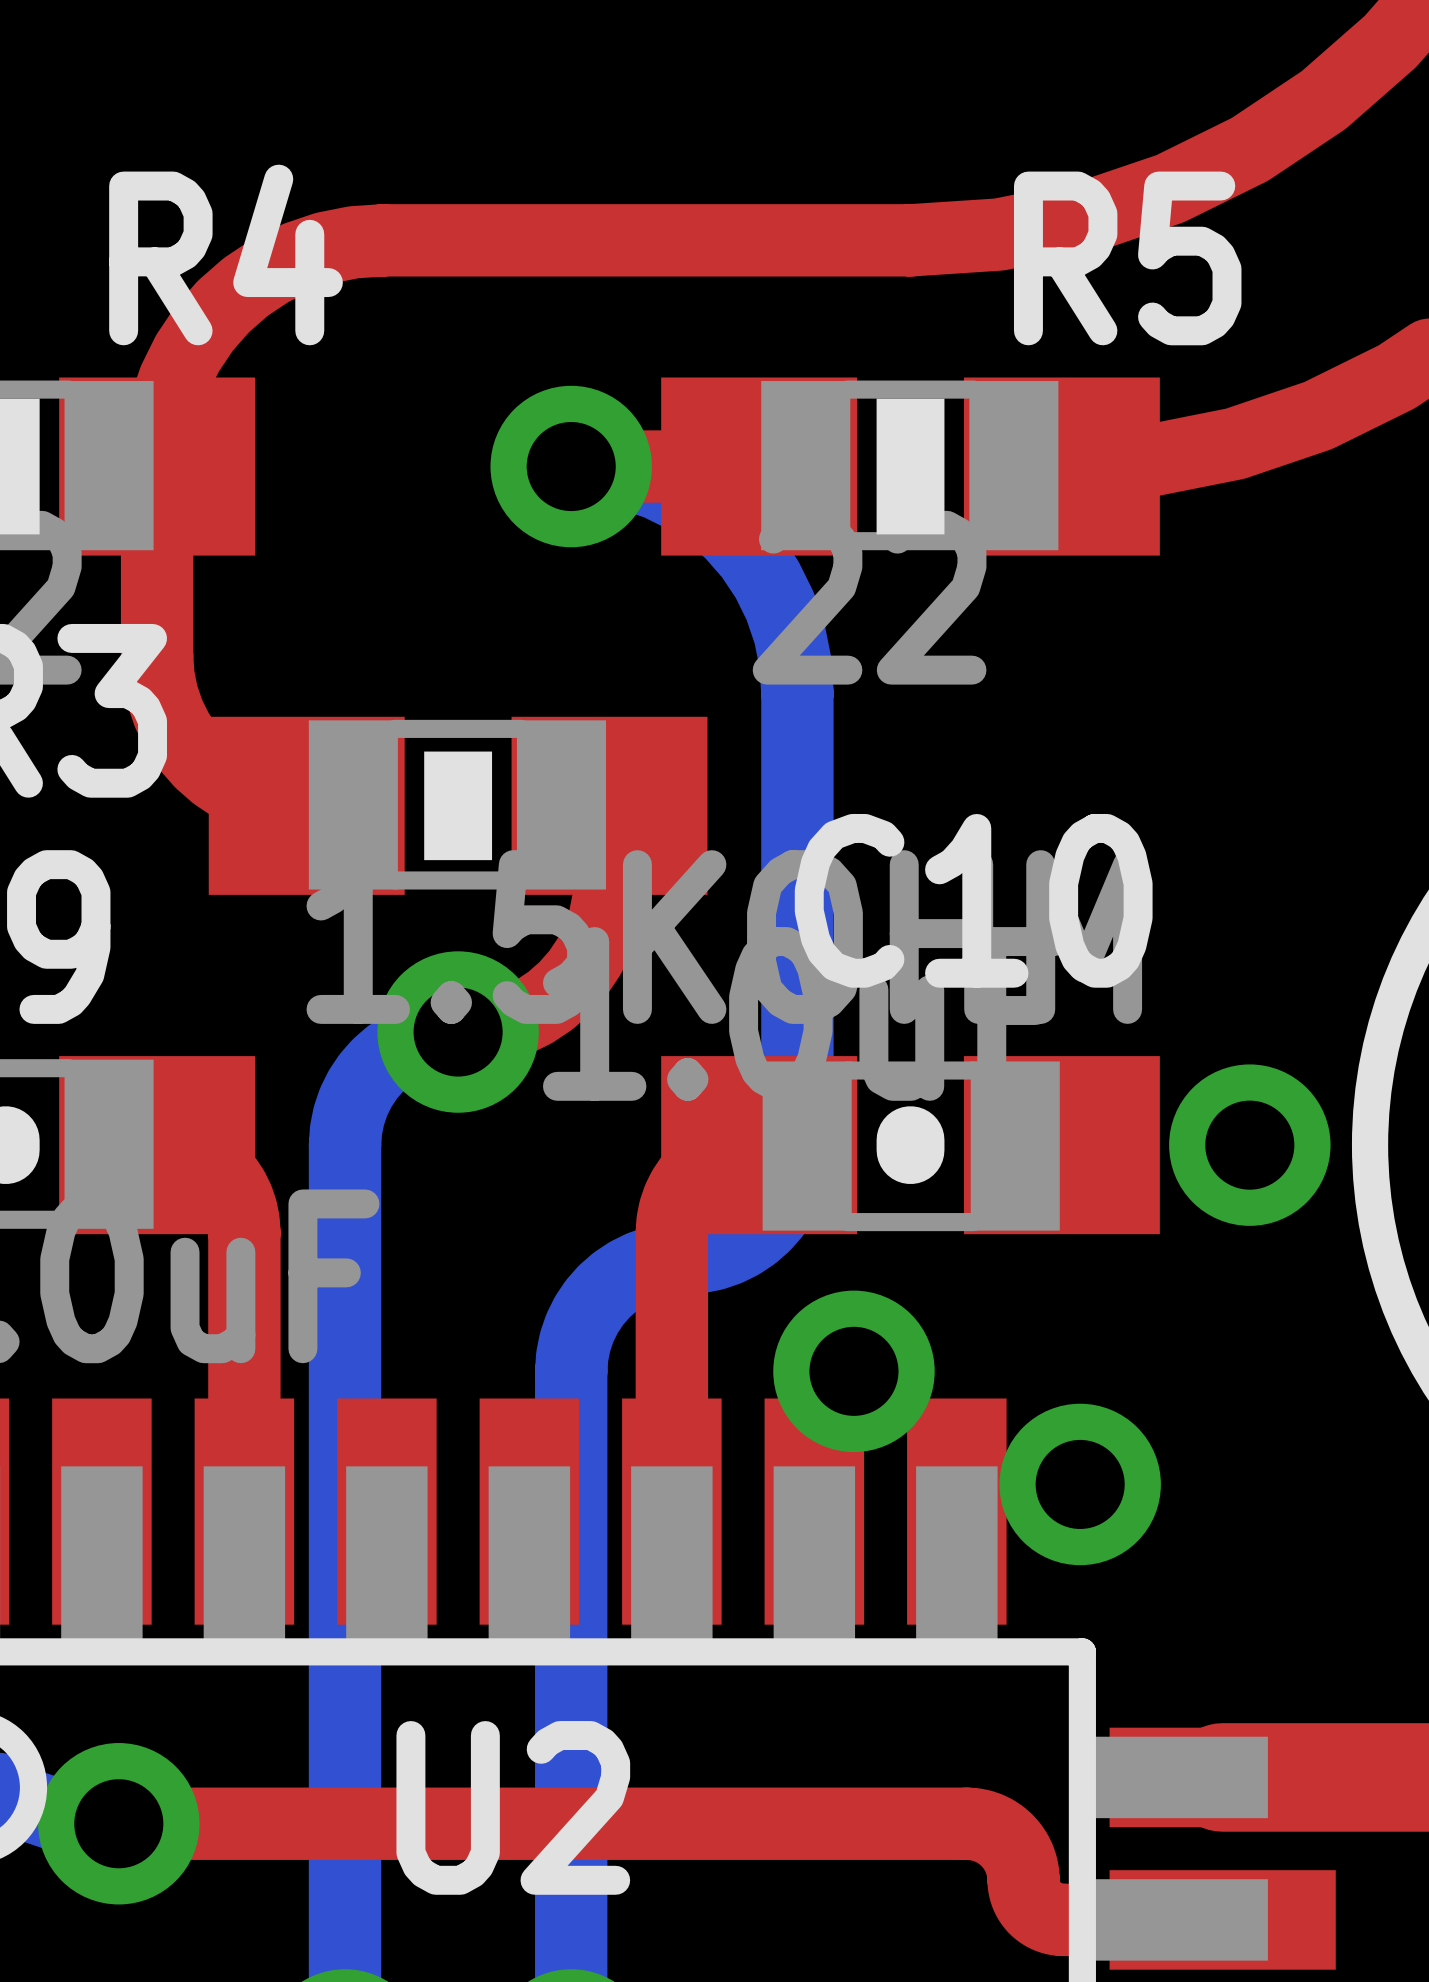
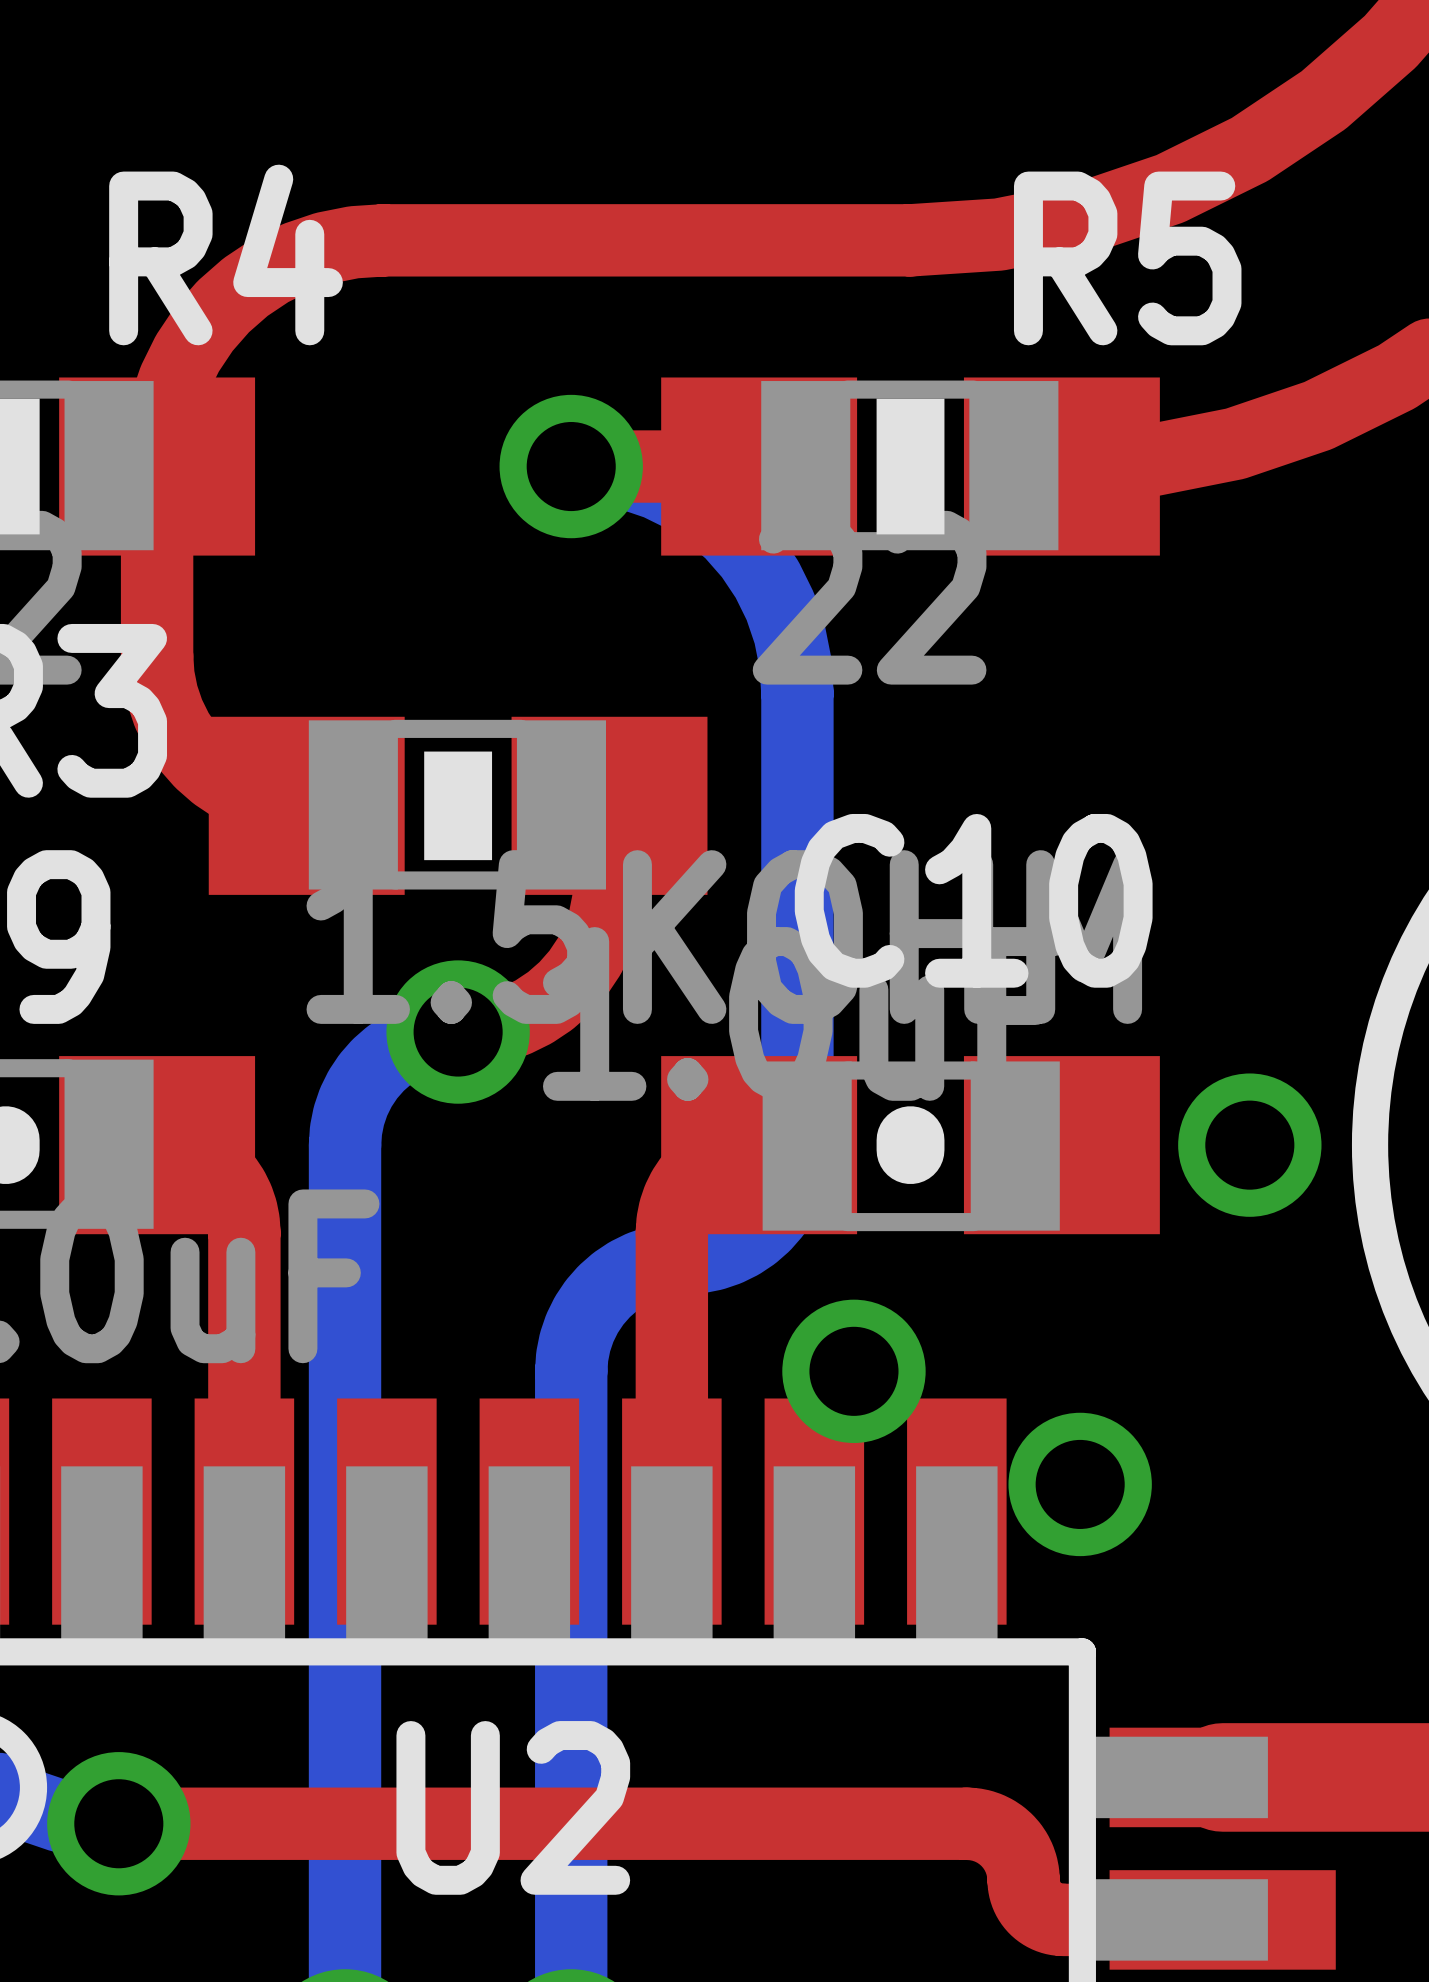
via size: [490, 385, 652, 548] -> [499, 394, 643, 539]
via size: [377, 951, 539, 1113] -> [386, 960, 530, 1104]
via size: [1169, 1064, 1331, 1226] -> [1178, 1073, 1322, 1217]
via size: [773, 1290, 935, 1453] -> [782, 1299, 926, 1444]
via size: [999, 1403, 1161, 1566] -> [1008, 1412, 1152, 1557]
via size: [38, 1743, 200, 1905] -> [47, 1752, 191, 1896]

